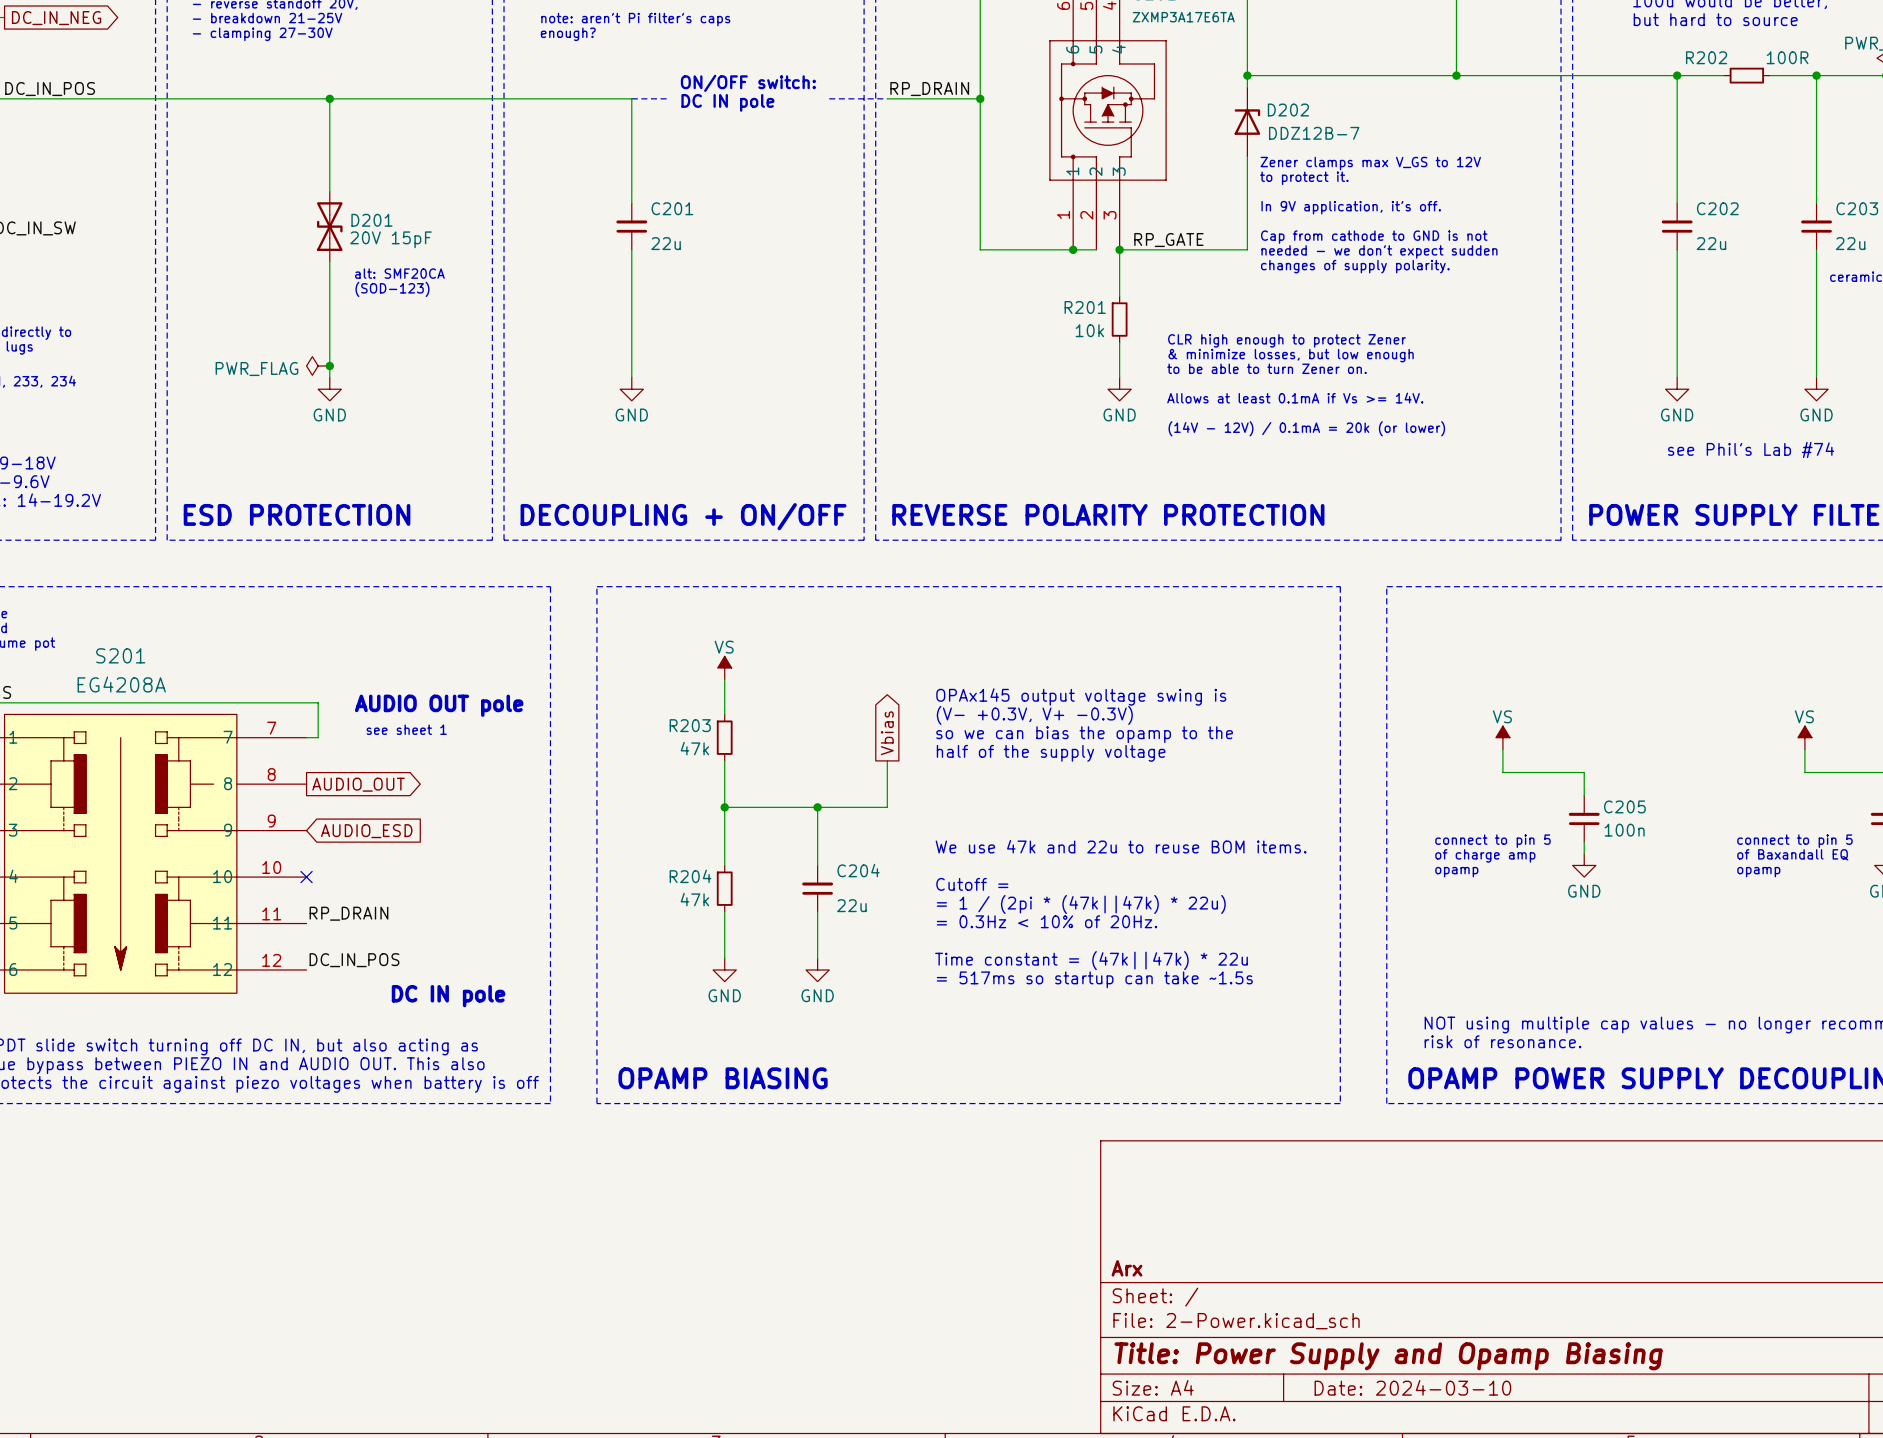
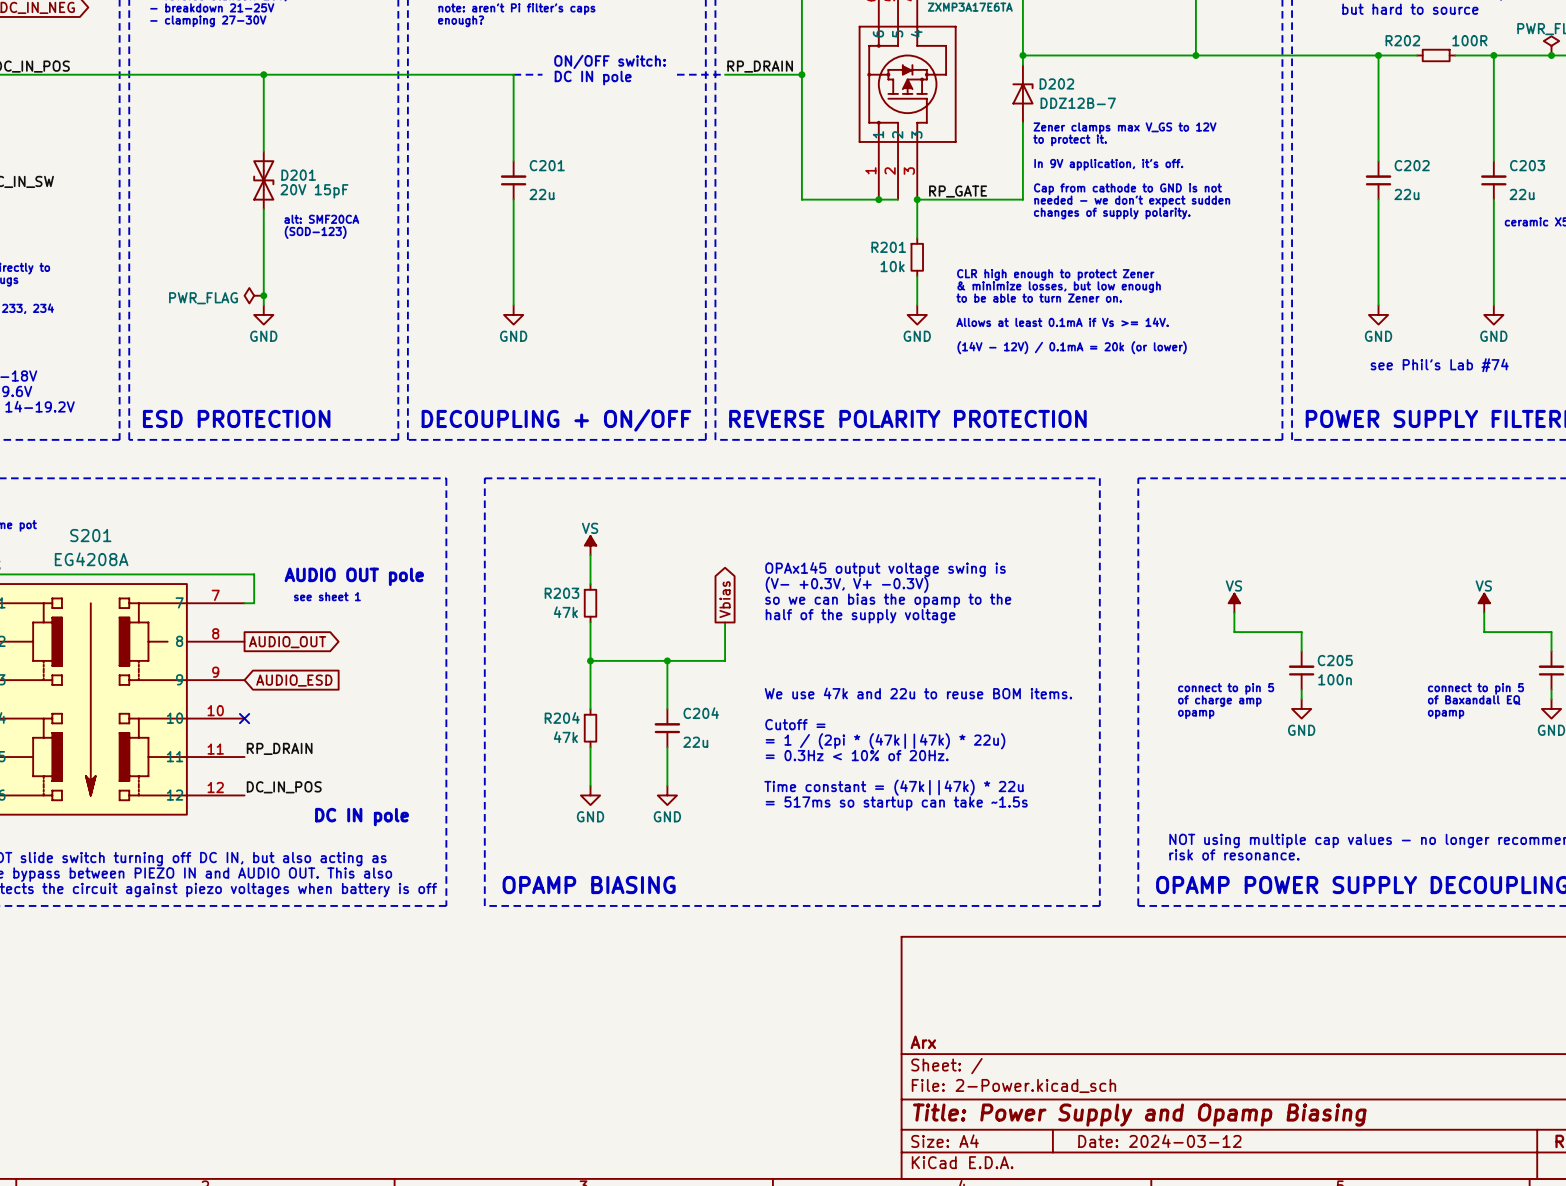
title block: Date: 2024-03-10 (1412, 1387) -> Date: 2024-03-12 (1159, 1141)

